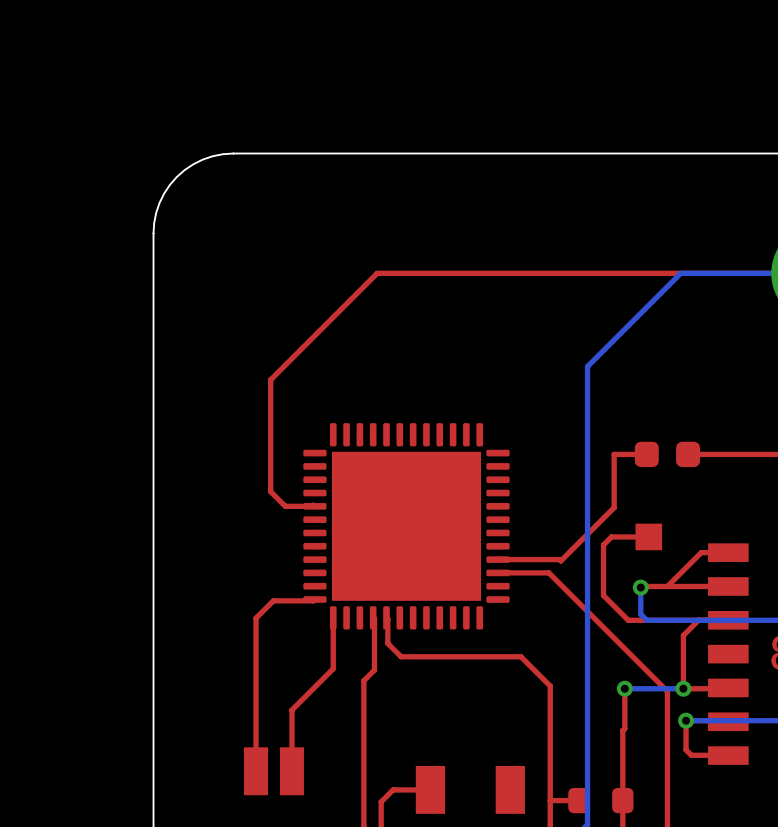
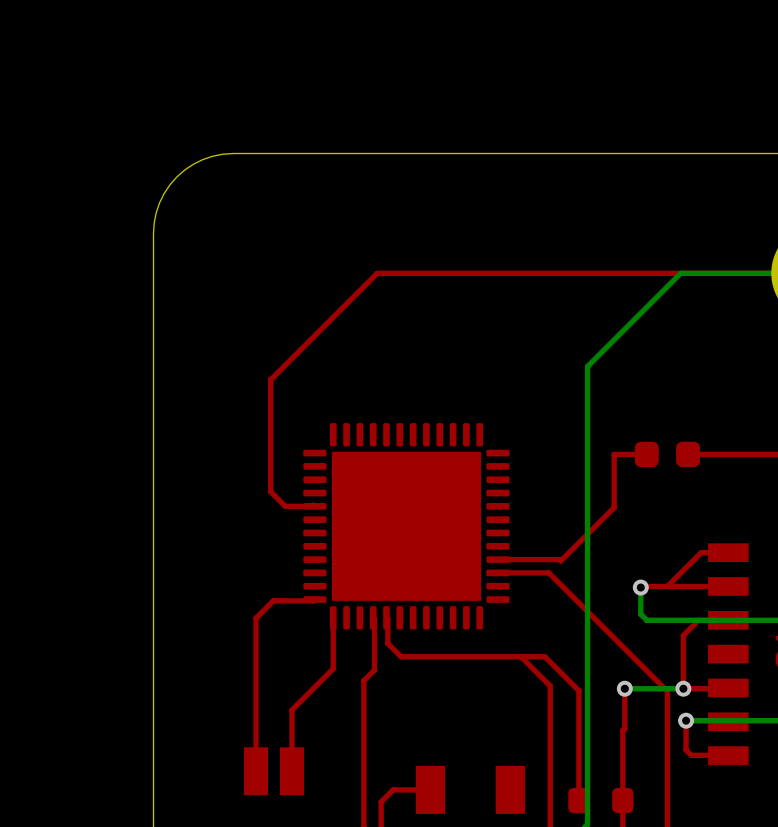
top track: (648, 536) (611, 536) (603, 544) (603, 595) (628, 620) (698, 620) -> none
part: (648, 536) -> none
top track: (578, 800) (550, 800) -> (578, 800) (578, 690) (544, 656) (520, 656)

